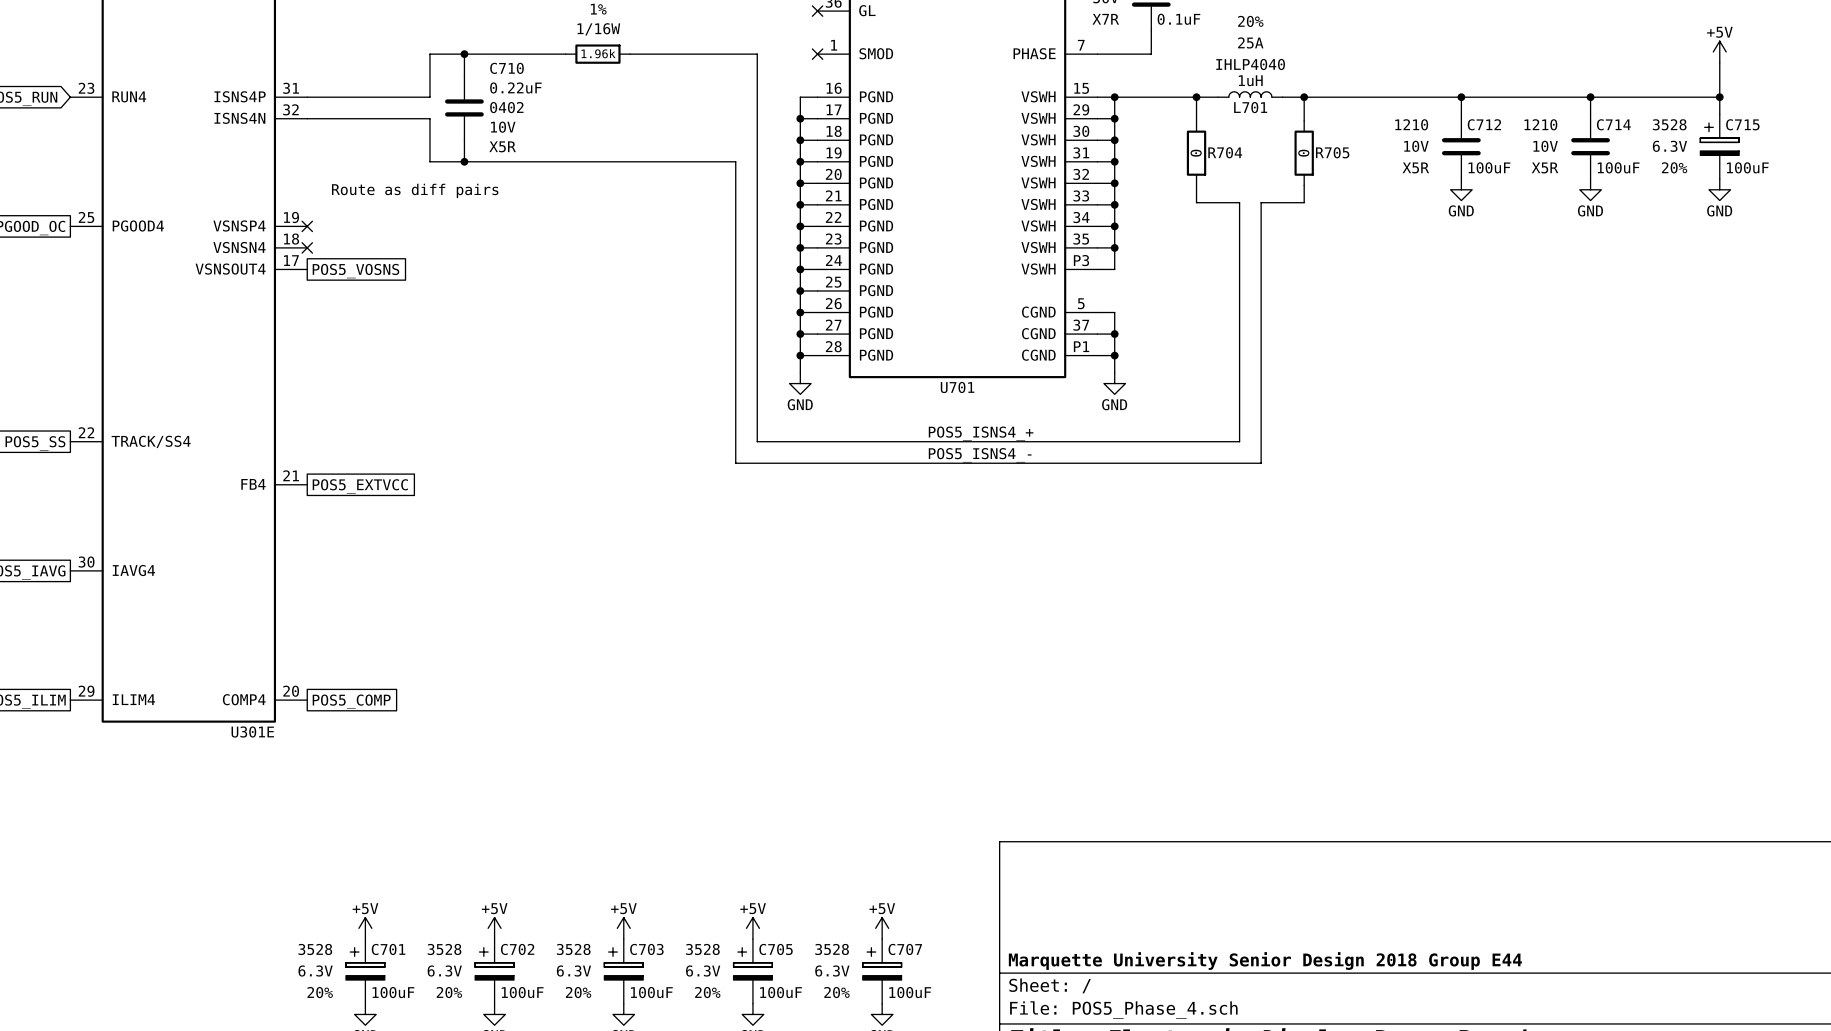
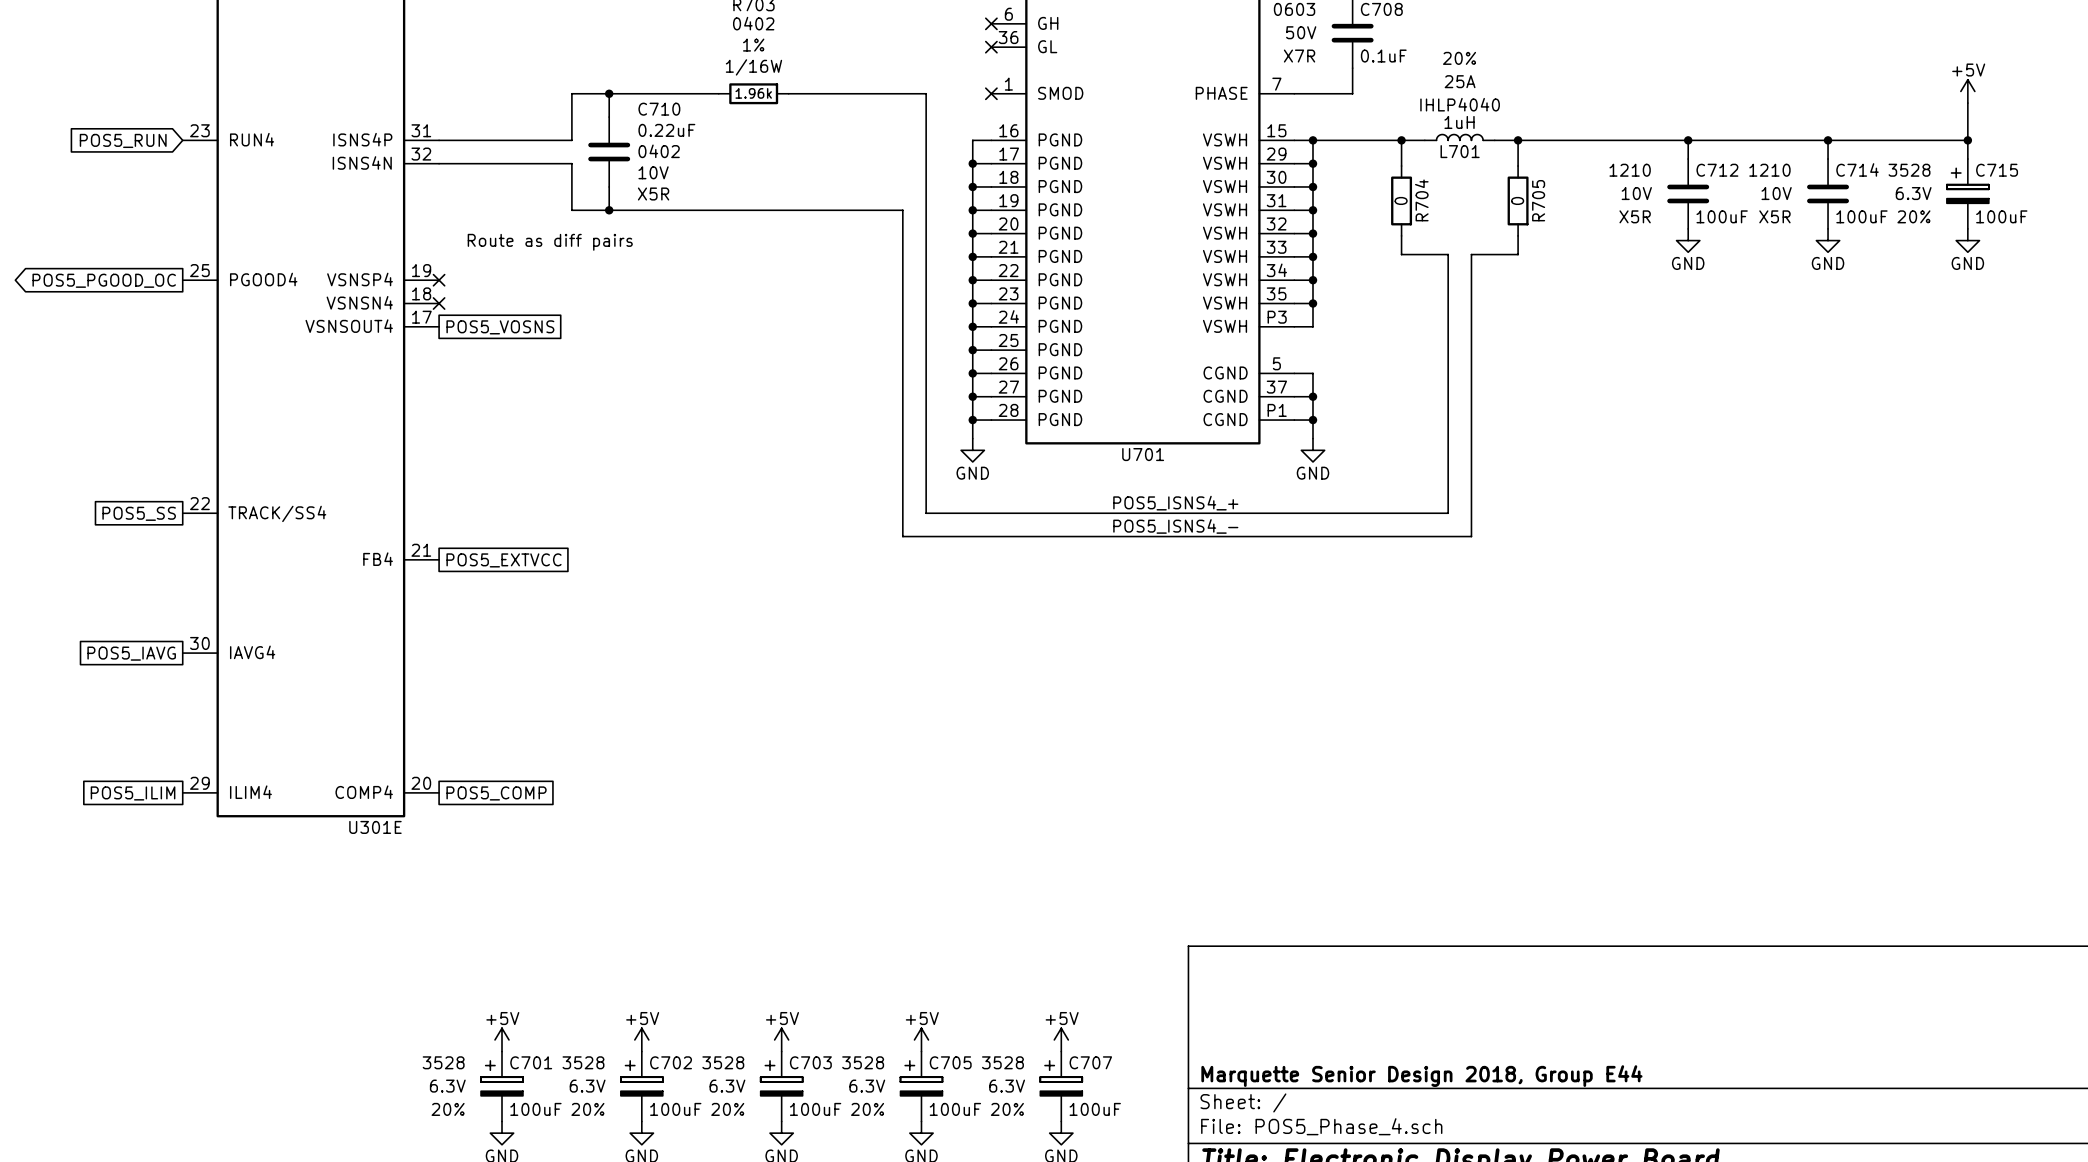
R704 name rotation: 0° (1225, 152) -> 90° counterclockwise (1421, 200)
R705 name rotation: 0° (1332, 152) -> 90° counterclockwise (1538, 200)
title block: Marquette University Senior Design 2018 Group E44 (1265, 961) -> Marquette Senior Design 2018, Group E44 (1421, 1076)

